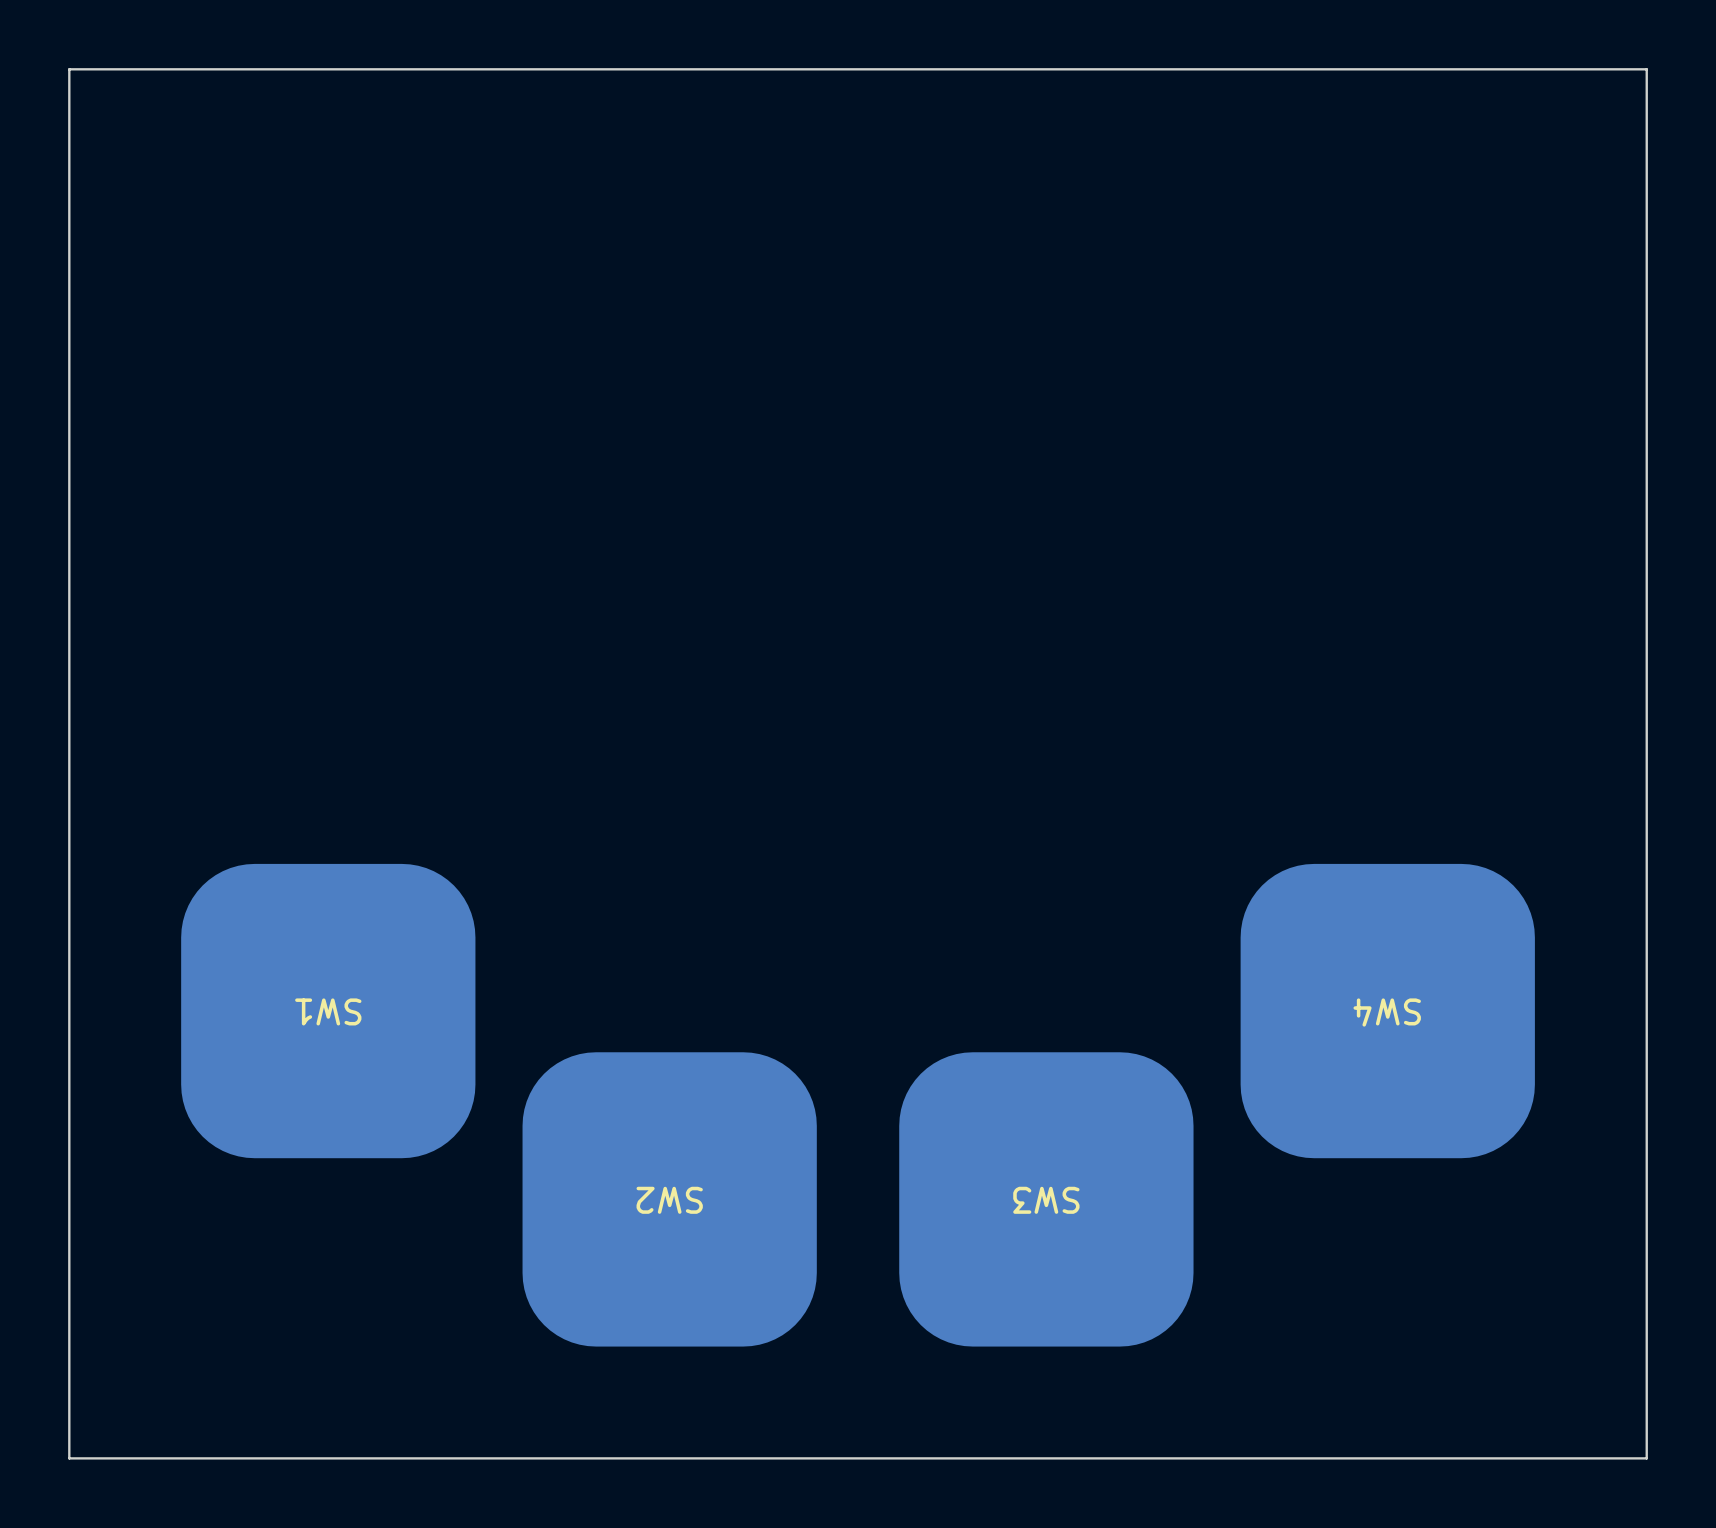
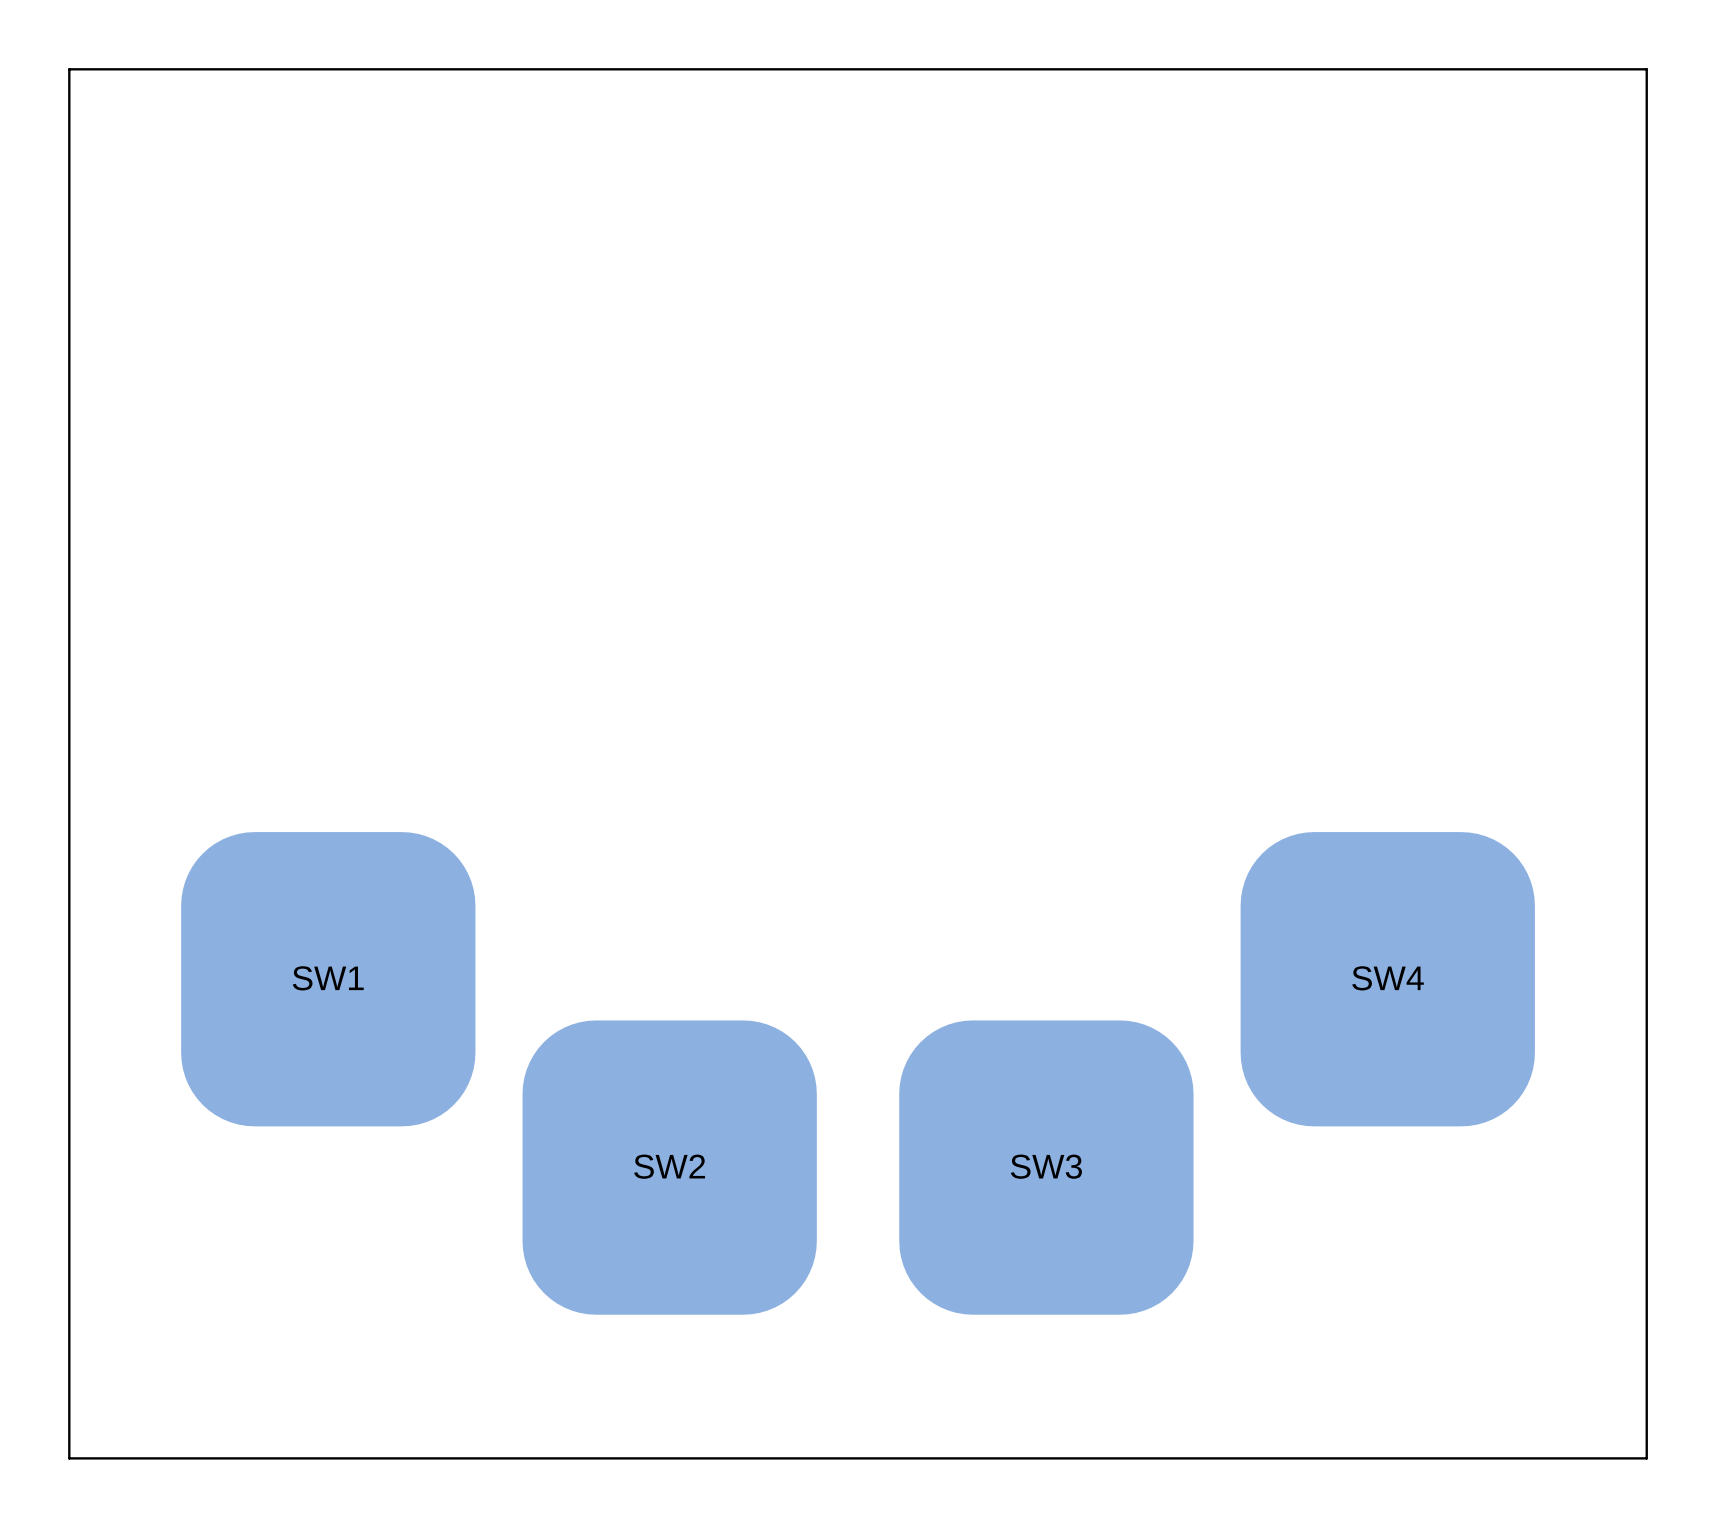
SW1 position: (328, 1011) -> (328, 979)
SW1 name rotation: 0° (328, 1011) -> 180° (328, 978)
SW4 position: (1387, 1011) -> (1387, 979)
SW4 name rotation: 0° (1387, 1012) -> 180° (1388, 978)
SW2 position: (669, 1199) -> (669, 1167)
SW3 position: (1046, 1199) -> (1046, 1167)
SW2 name rotation: 0° (669, 1200) -> 180° (669, 1166)
SW3 name rotation: 0° (1046, 1200) -> 180° (1046, 1166)

